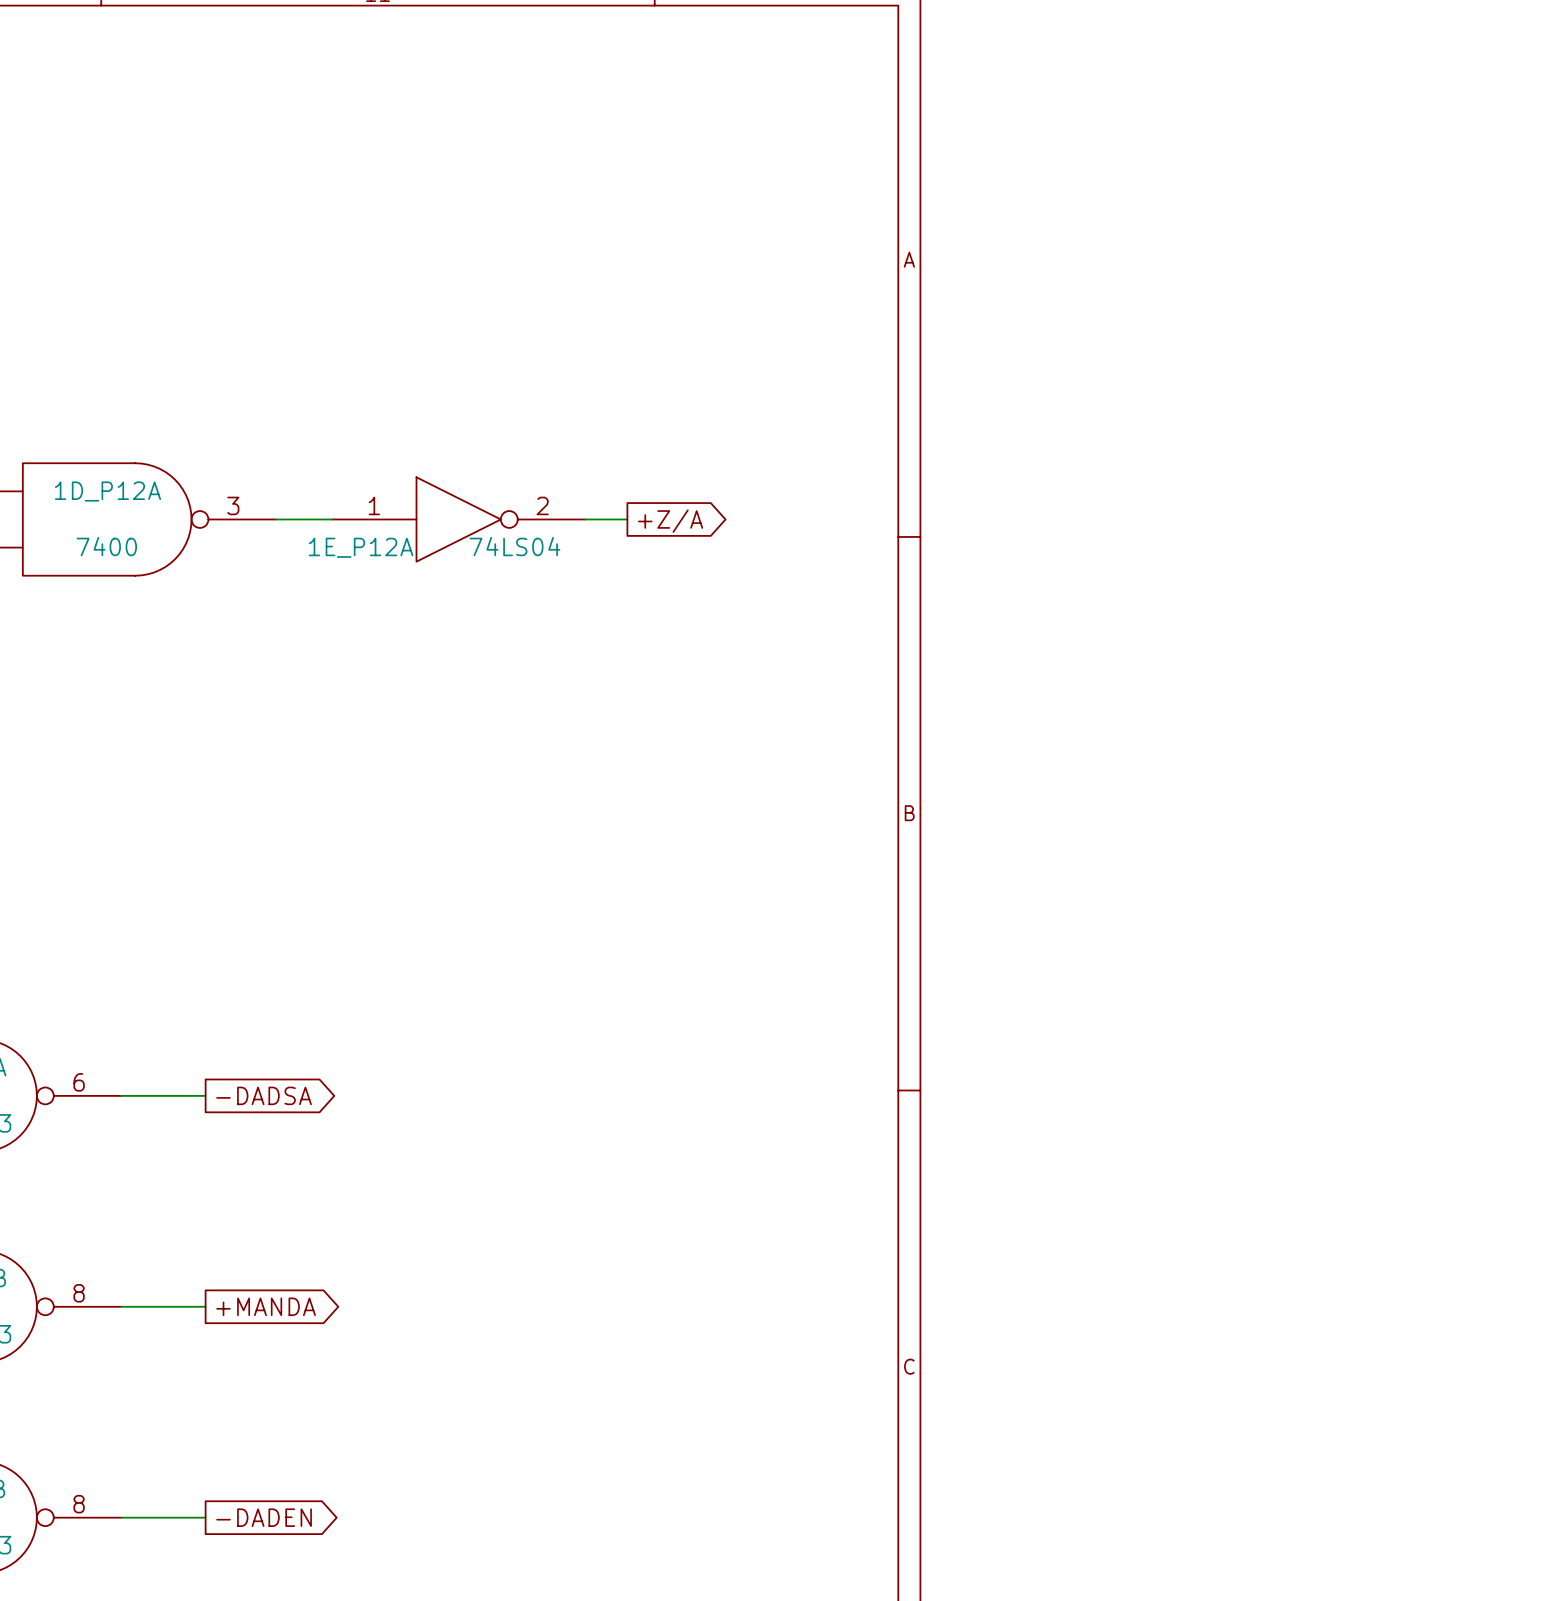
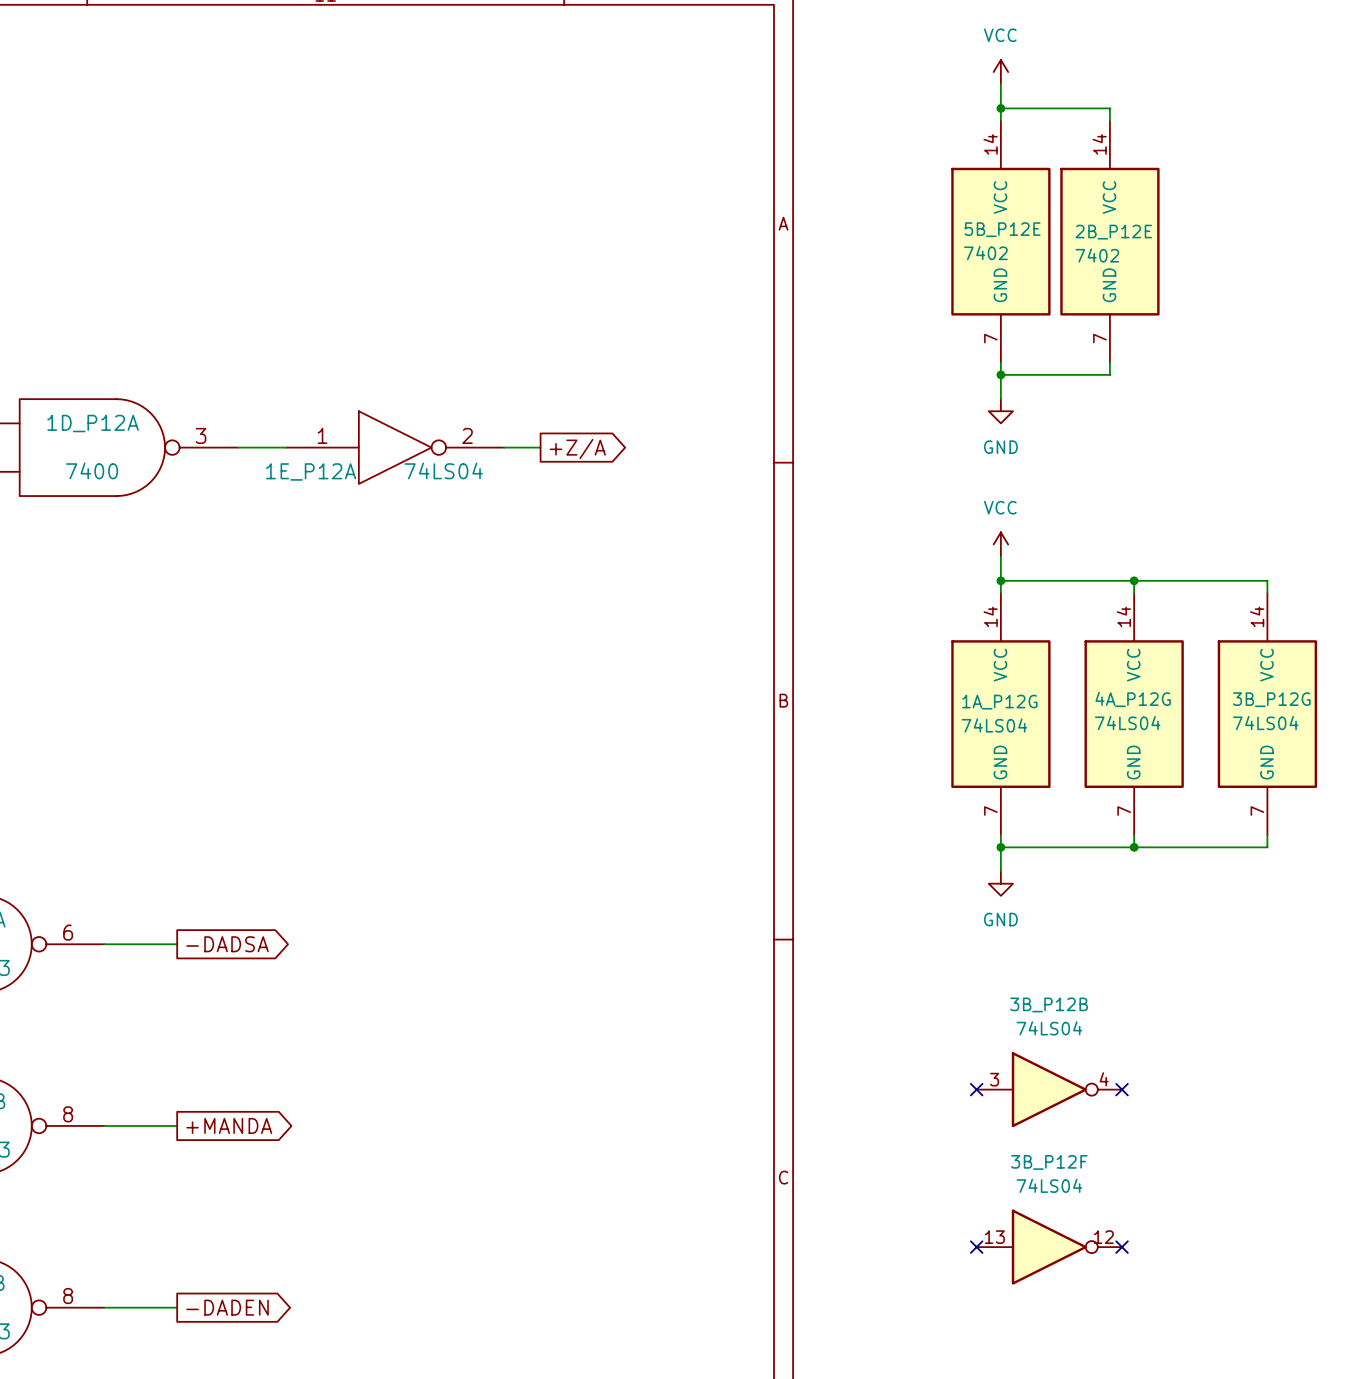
power symbol: none -> VCC (1000, 72)
wire: none -> (1000, 84) (1000, 120)
wire: none -> (1000, 108) (1109, 108) (1109, 120)
junction: none -> (1000, 108)
5B_P12E: none -> 7402 (1000, 241)
2B_P12E: none -> 7402 (1109, 241)
wire: none -> (1000, 362) (1000, 399)
wire: none -> (1109, 362) (1109, 374) (1000, 374)
junction: none -> (1000, 374)
power symbol: none -> GND (1000, 411)
power symbol: none -> VCC (1000, 544)
wire: none -> (1000, 556) (1000, 592)
wire: none -> (1000, 580) (1267, 580) (1267, 592)
junction: none -> (1000, 580)
wire: none -> (1134, 580) (1134, 592)
junction: none -> (1134, 580)
1A_P12G: none -> 74LS04 (1000, 714)
4A_P12G: none -> 74LS04 (1134, 714)
3B_P12G: none -> 74LS04 (1267, 714)
wire: none -> (1000, 835) (1000, 871)
wire: none -> (1134, 835) (1134, 847)
wire: none -> (1267, 835) (1267, 847) (1000, 847)
junction: none -> (1000, 847)
junction: none -> (1134, 847)
power symbol: none -> GND (1000, 883)
no-connect mark: none -> (976, 1089)
3B_P12B: none -> 74LS04 (1049, 1089)
no-connect mark: none -> (1122, 1089)
no-connect mark: none -> (976, 1247)
3B_P12F: none -> 74LS04 (1049, 1247)
no-connect mark: none -> (1122, 1247)

